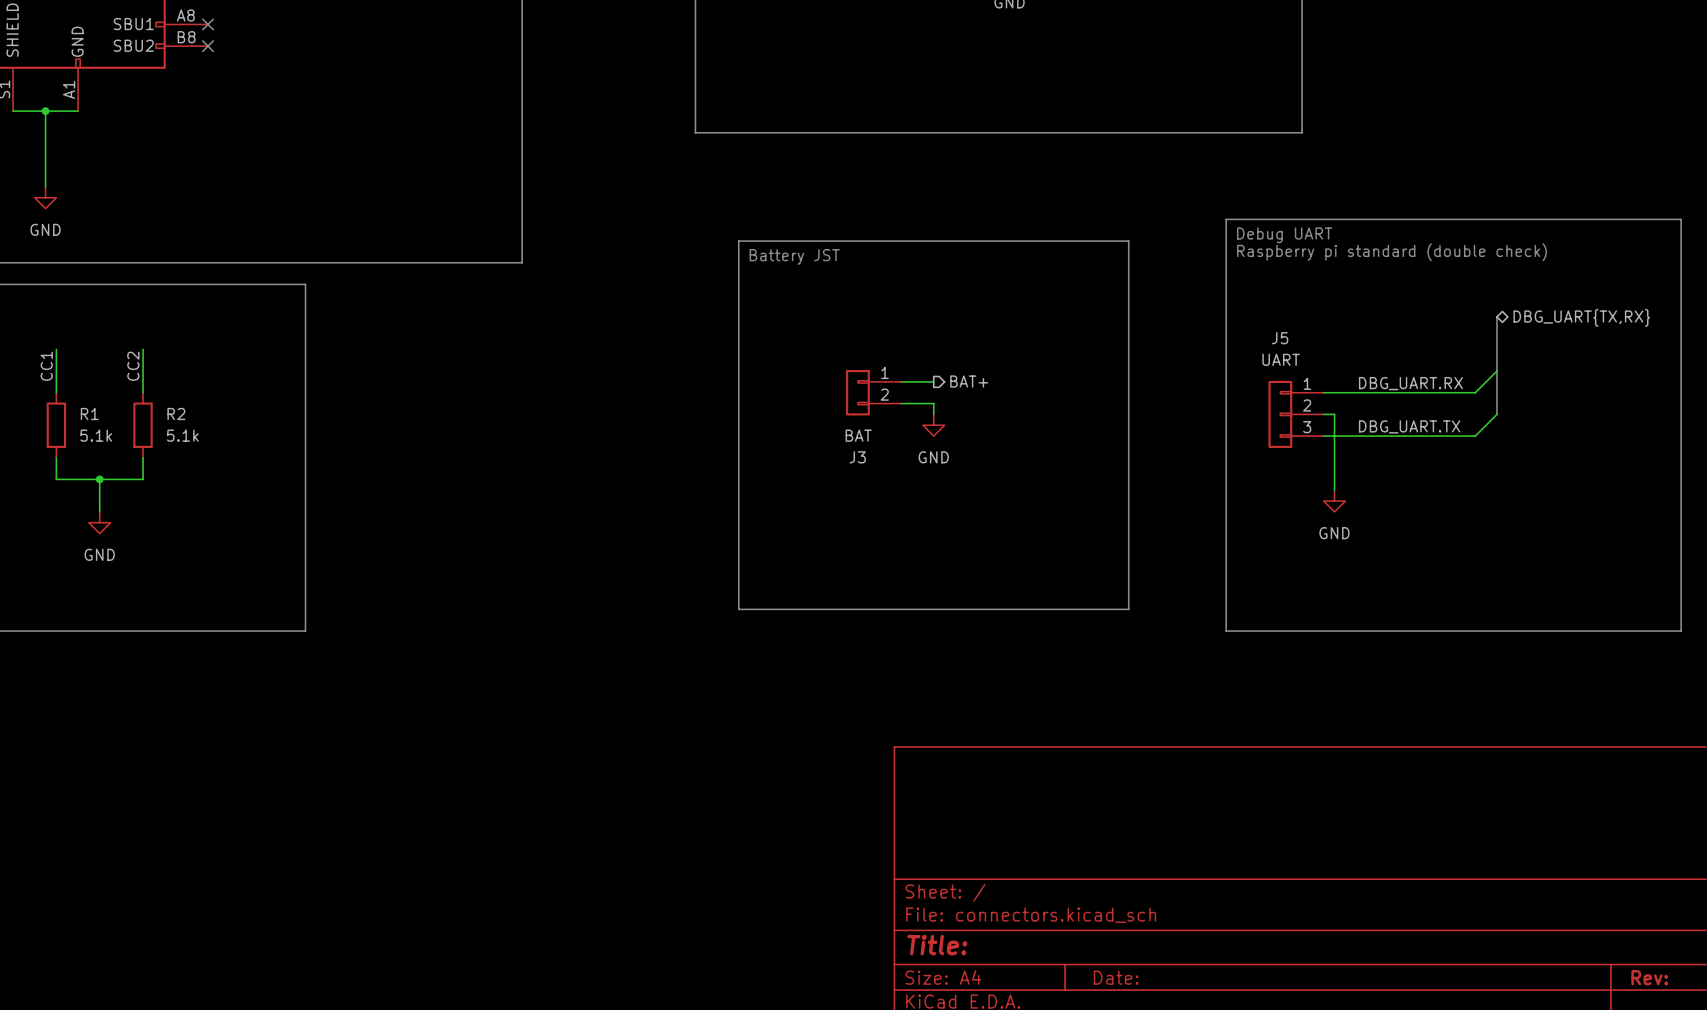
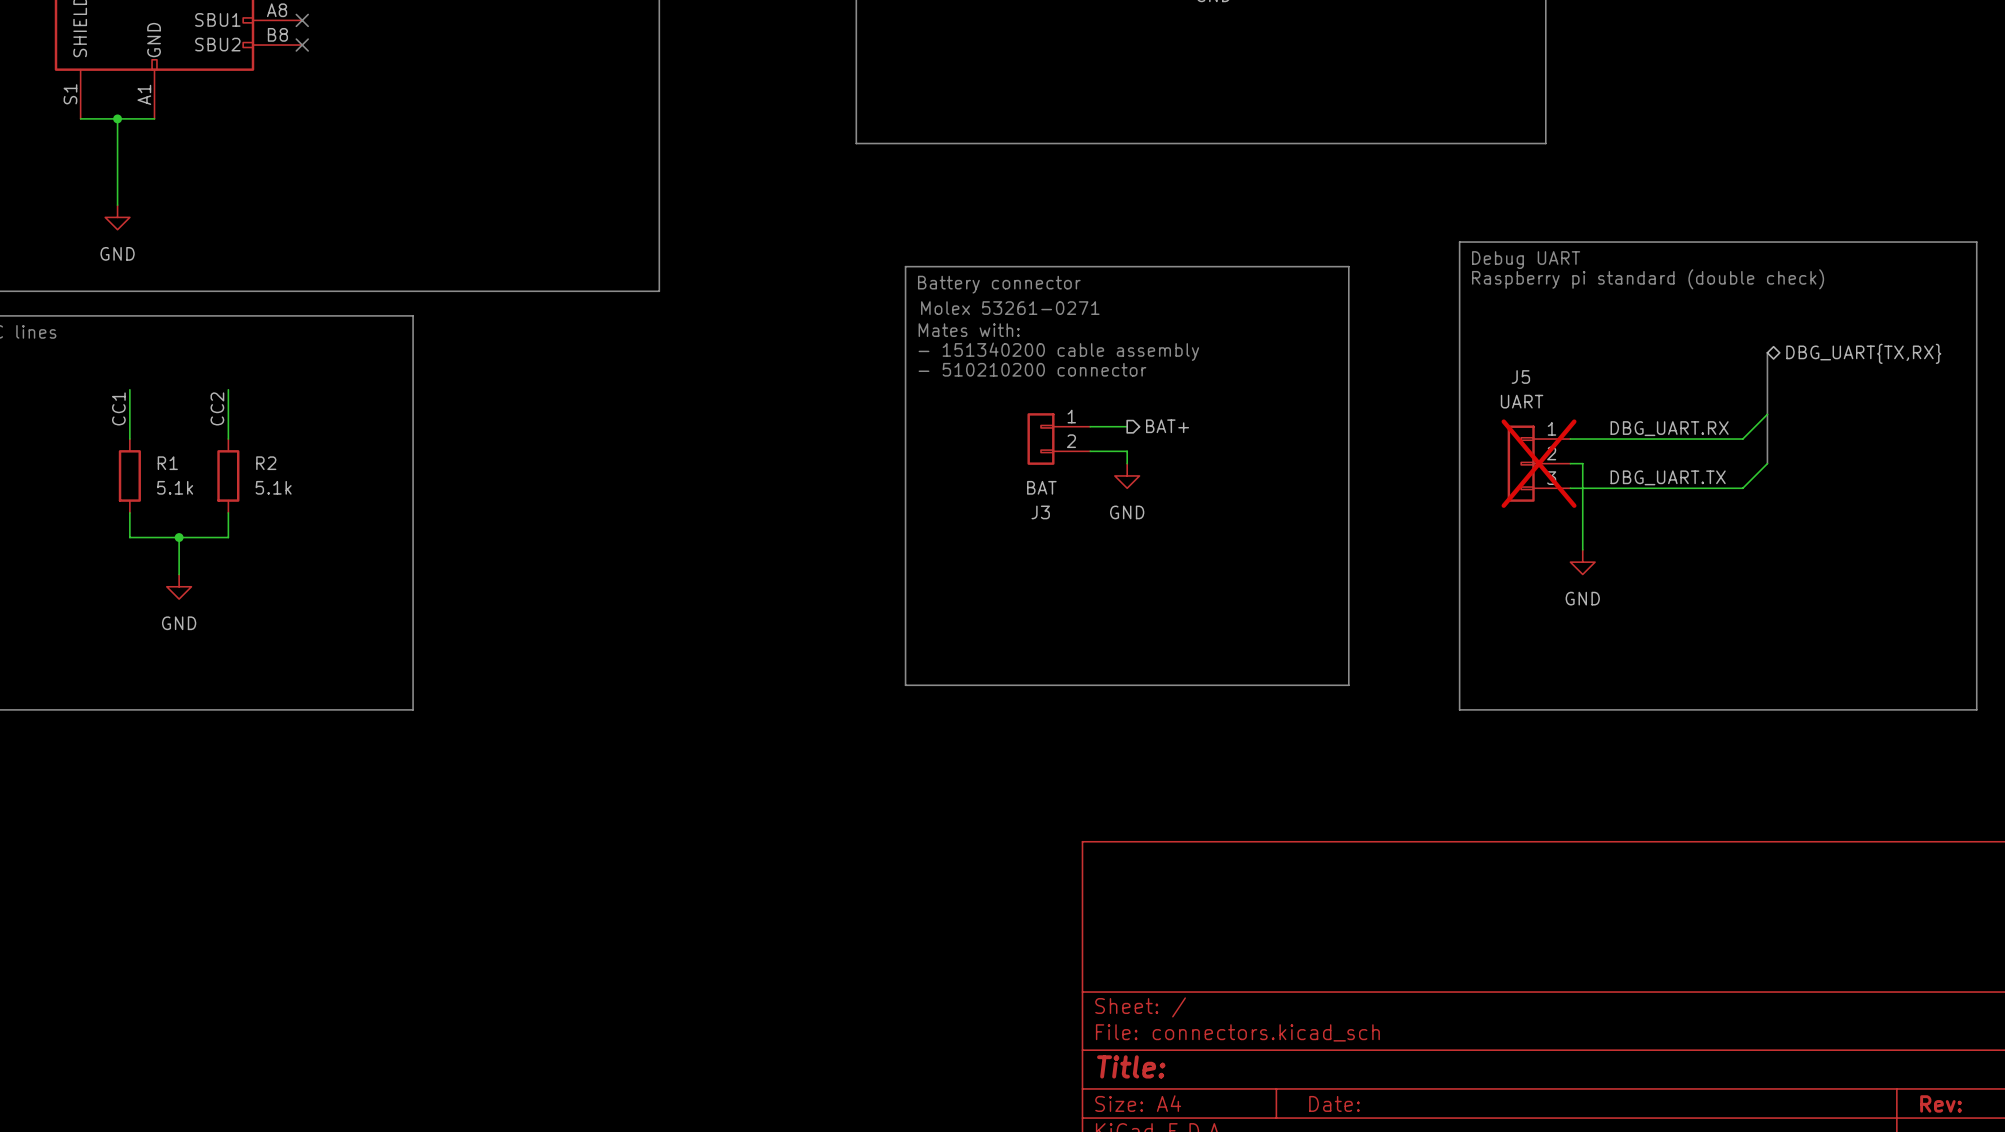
text: Battery JST (794, 256) -> Battery connector (999, 284)
text: none -> Molex 53261-0271 (1010, 308)
text: none -> Mates with: (969, 330)
text: none -> - 151340200 cable assembly (1058, 351)
text: none -> - 510210200 connector (1032, 369)
J5 do-not-place cross: none -> (1539, 463)

